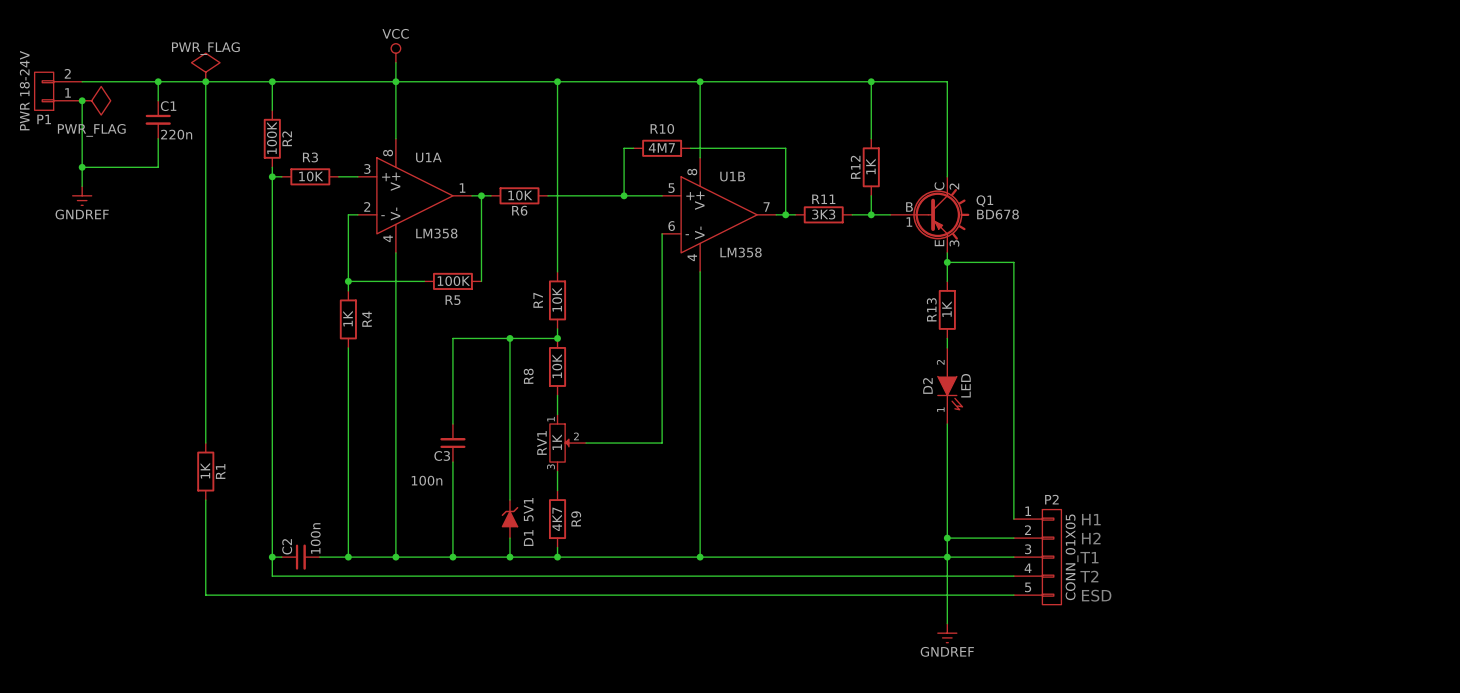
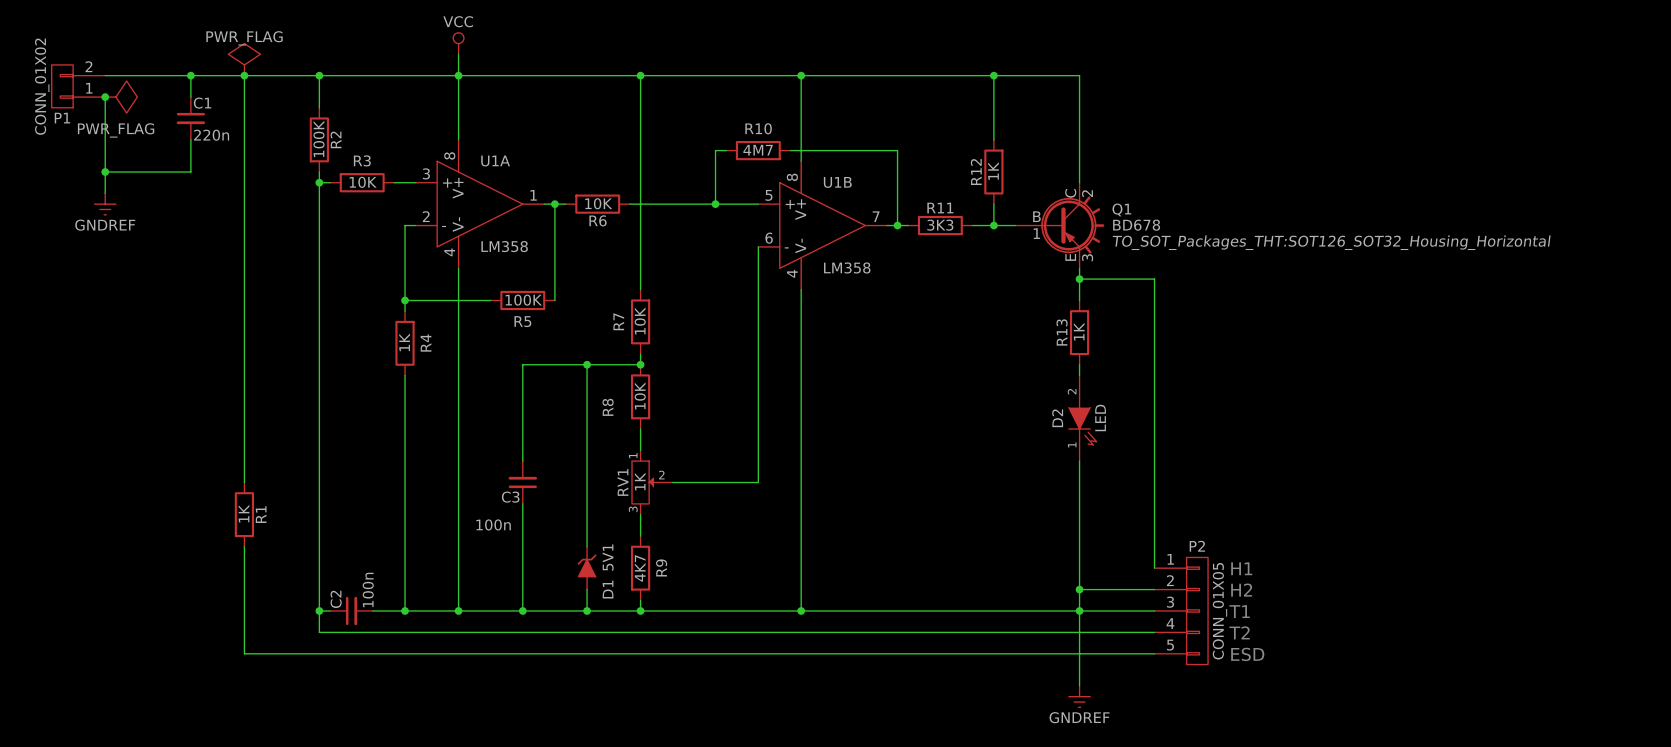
P1 value: PWR 18-24V (24, 90) -> CONN_01X02 (42, 86)
Q1 text: none -> TO_SOT_Packages_THT:SOT126_SOT32_Housing_Horizontal (1331, 242)

